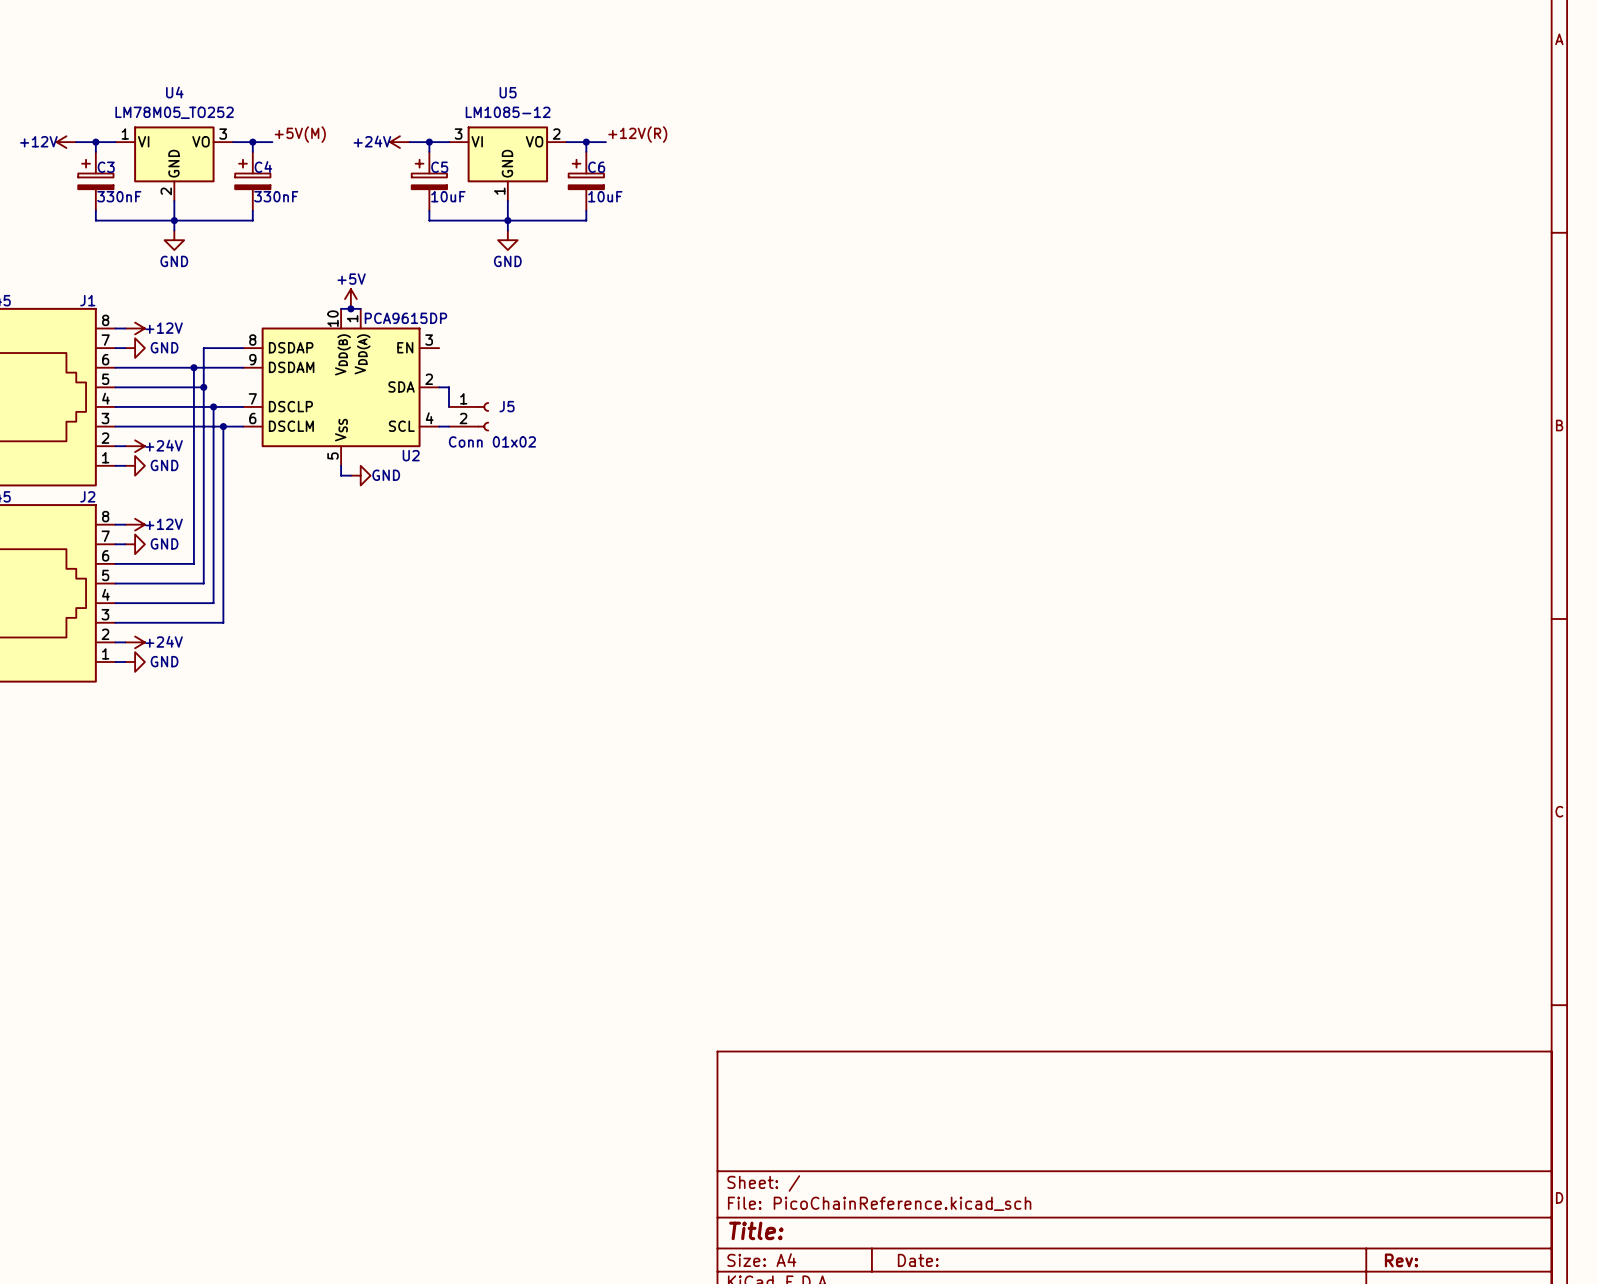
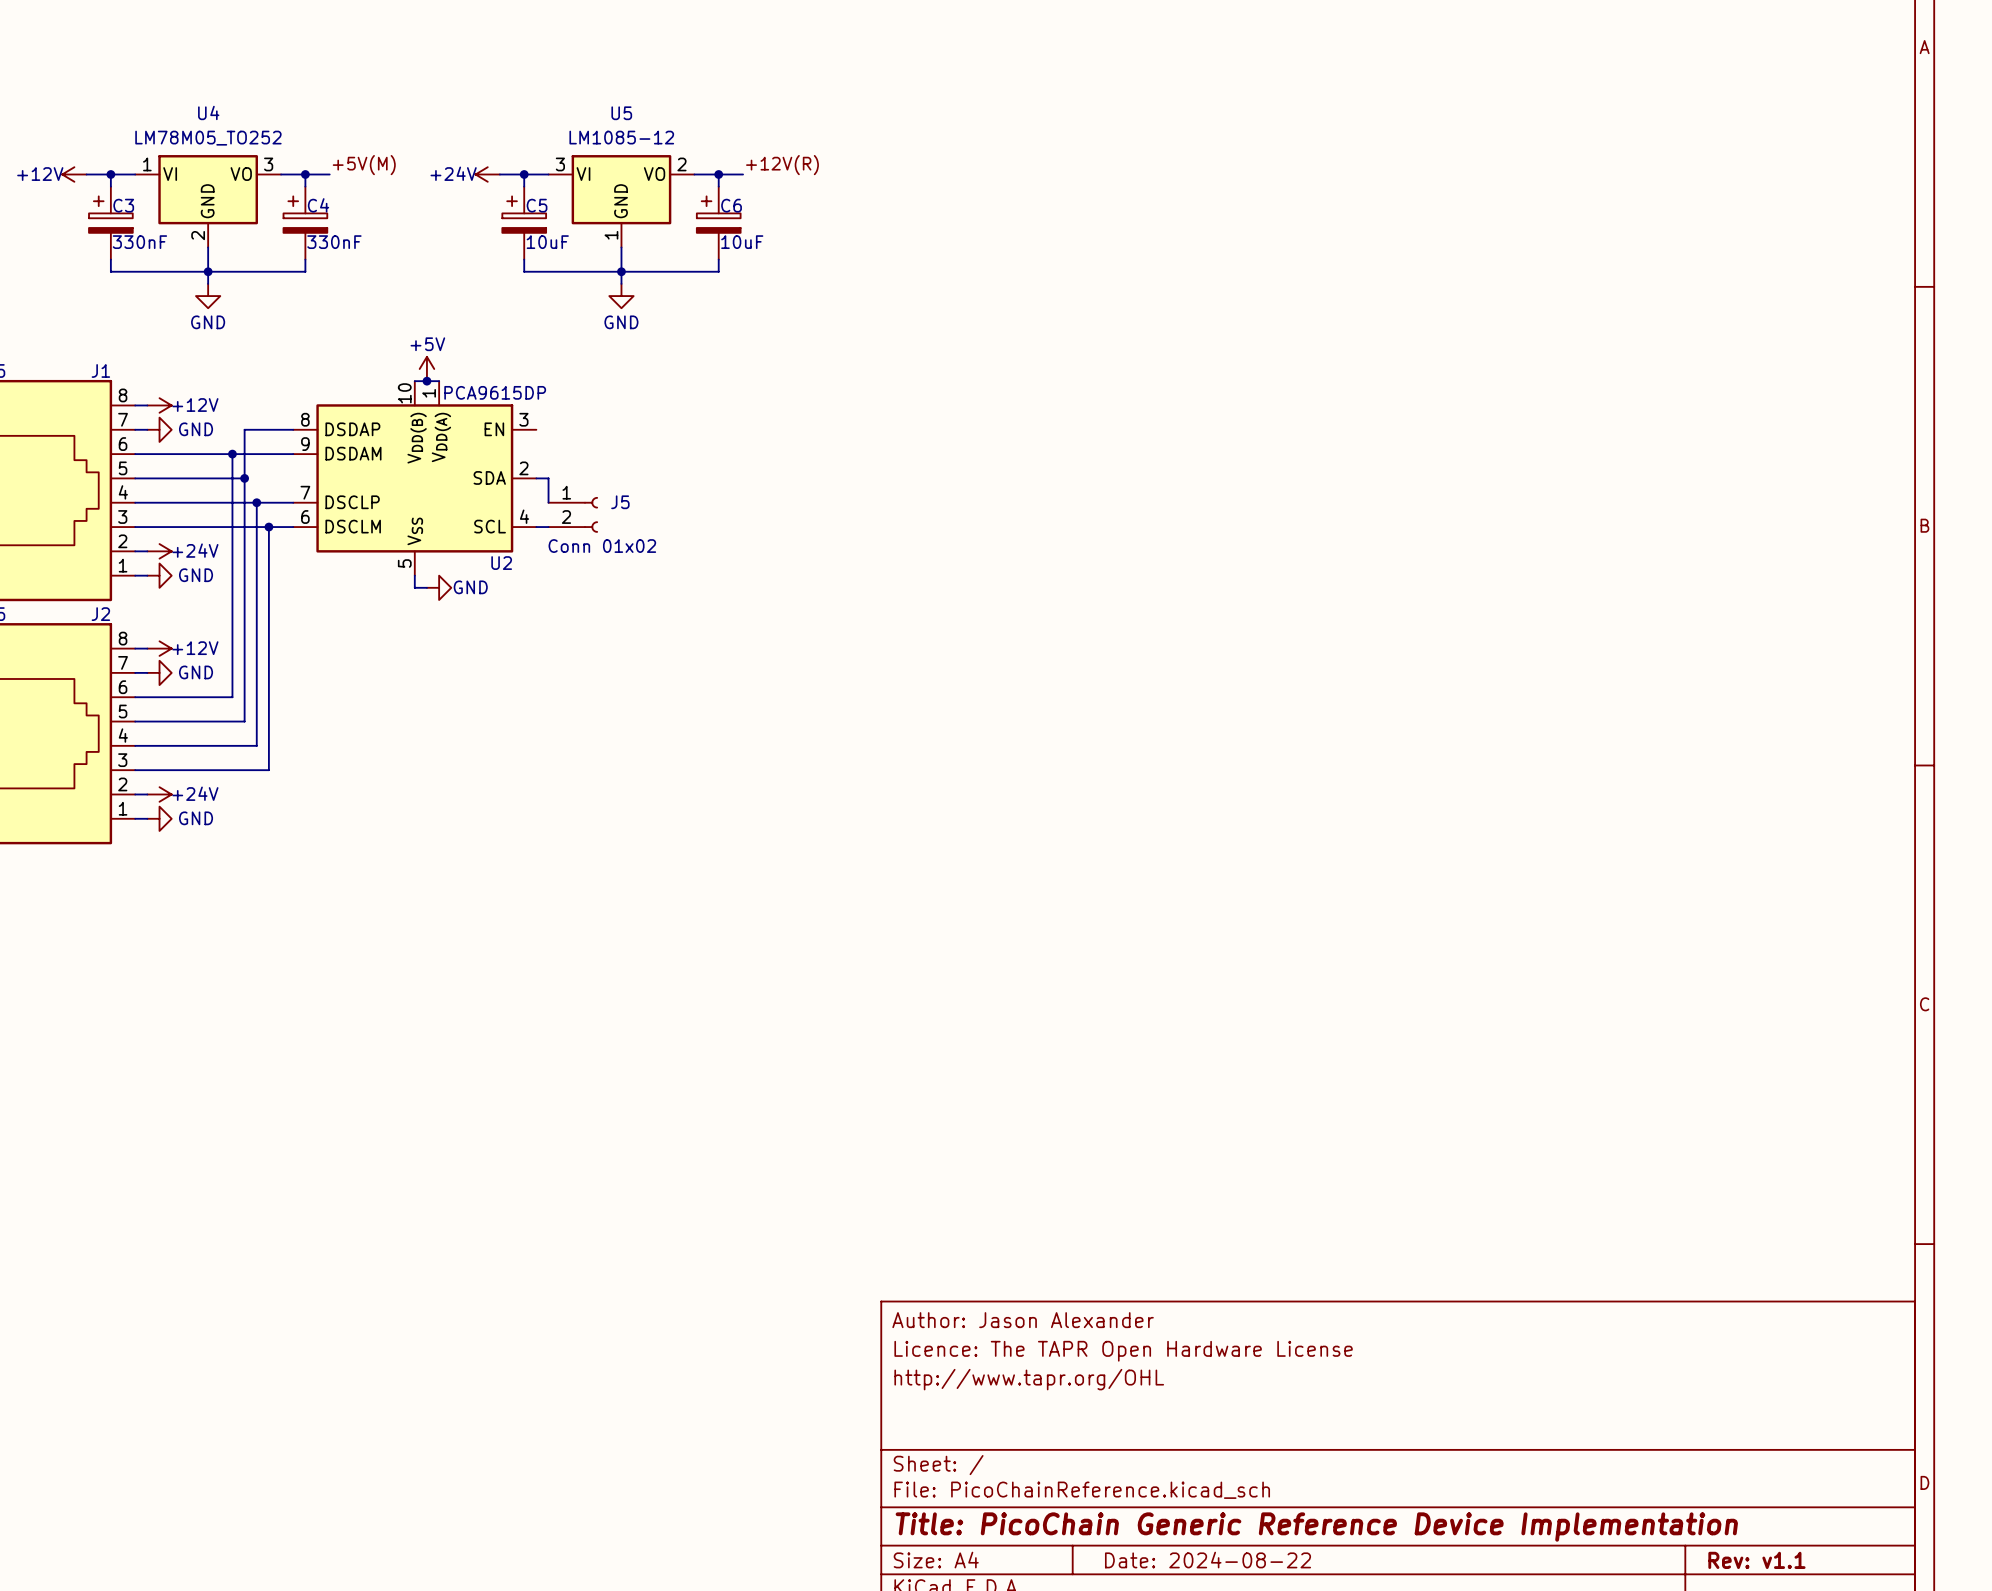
title block: none -> Author: Jason Alexander (1023, 1320)
title block: none -> Licence: The TAPR Open Hardware License (1123, 1351)
title block: none -> http://www.tapr.org/OHL (1029, 1379)
title block: Title: (756, 1230) -> Title: PicoChain Generic Reference Device Implementation (1316, 1527)
title block: Date: (918, 1260) -> Date: 2024-08-22 (1208, 1560)
title block: Rev: (1401, 1260) -> Rev: v1.1 (1756, 1560)

